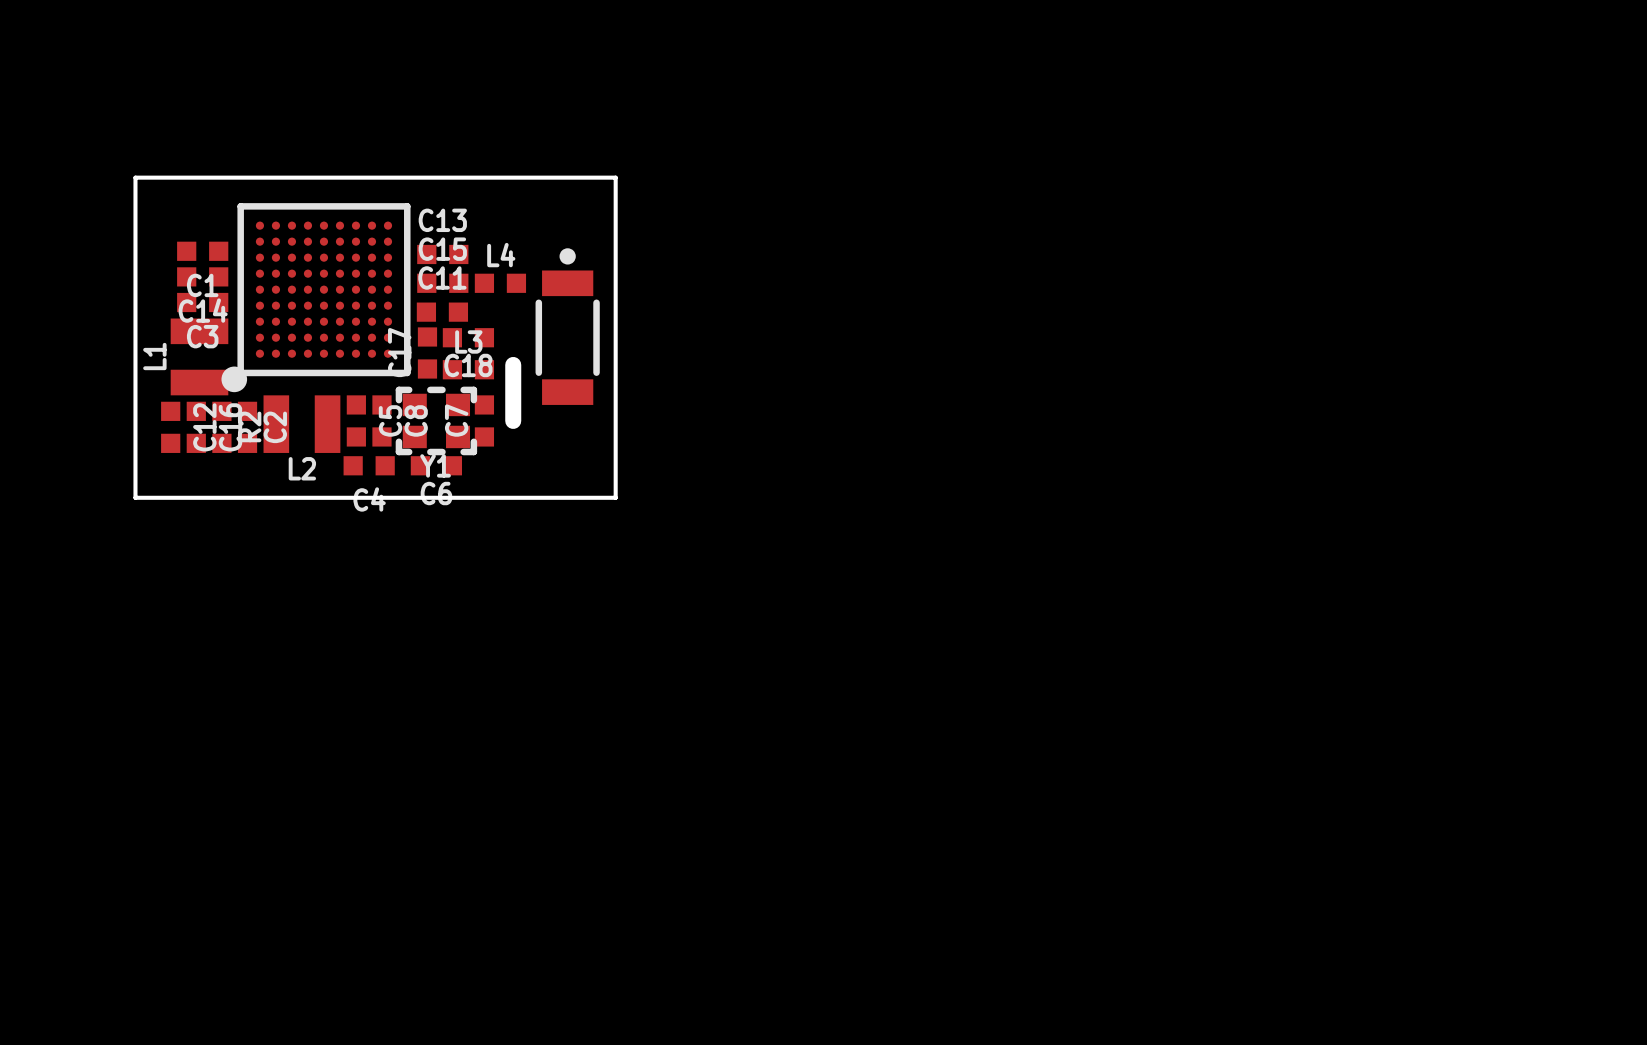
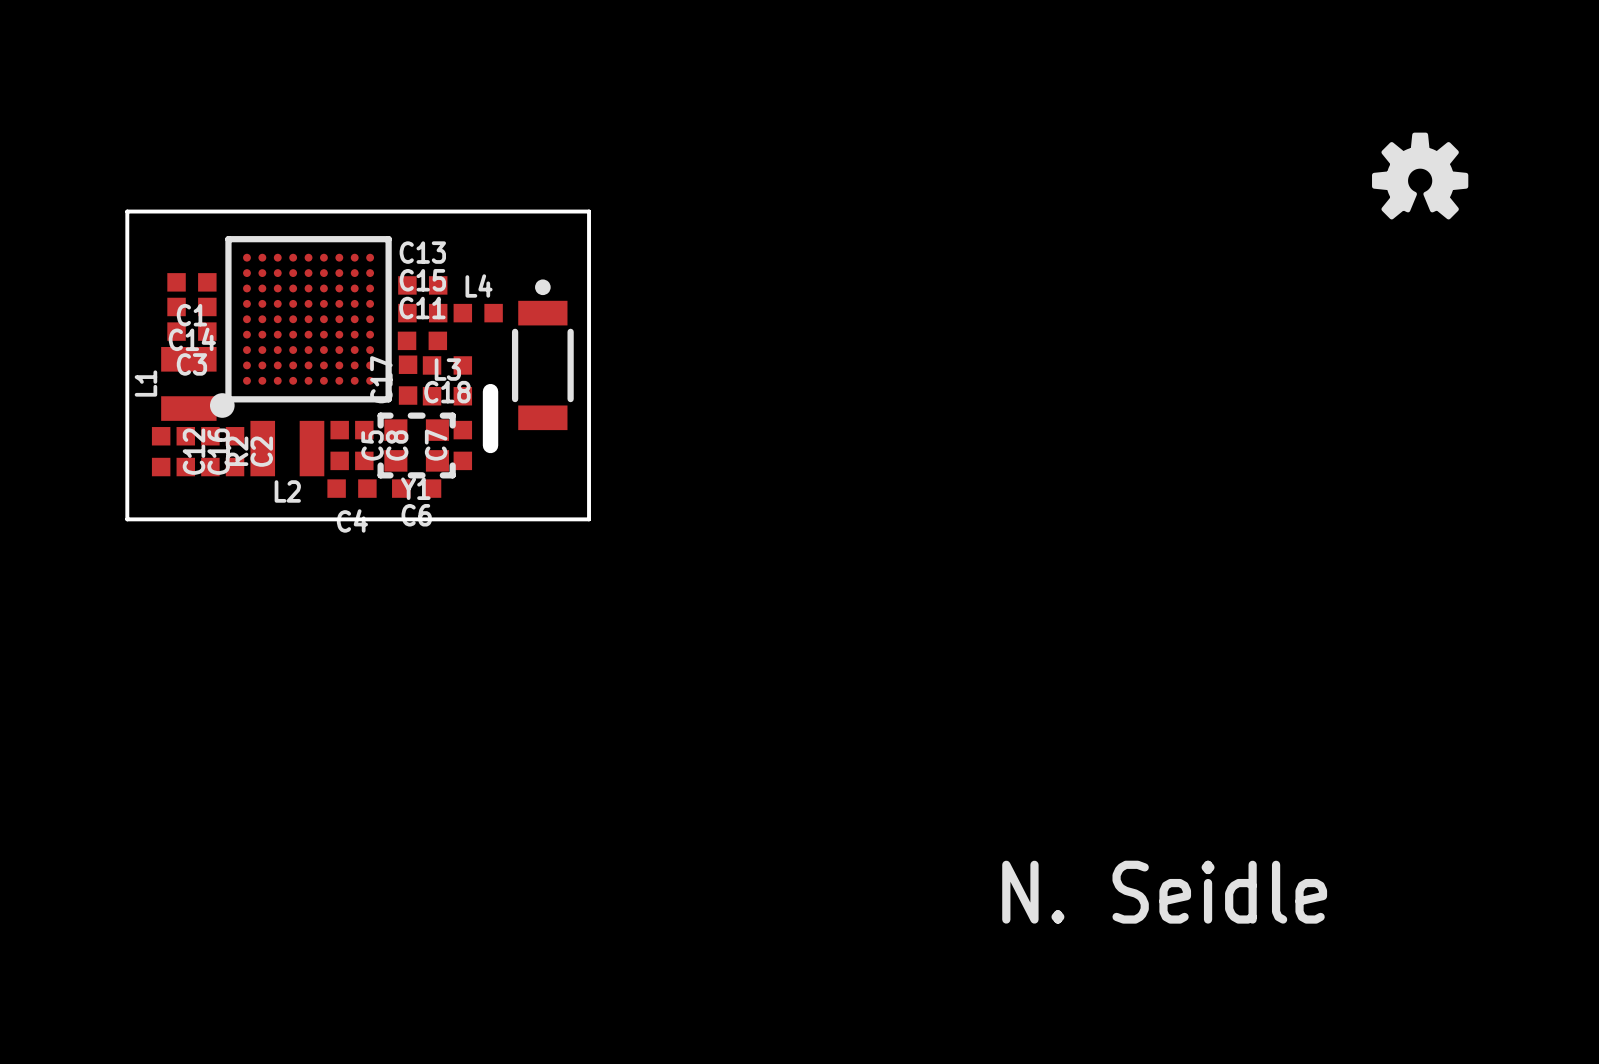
drawing: none -> [1372, 132, 1469, 220]
text: none -> N. Seidle (1164, 892)

